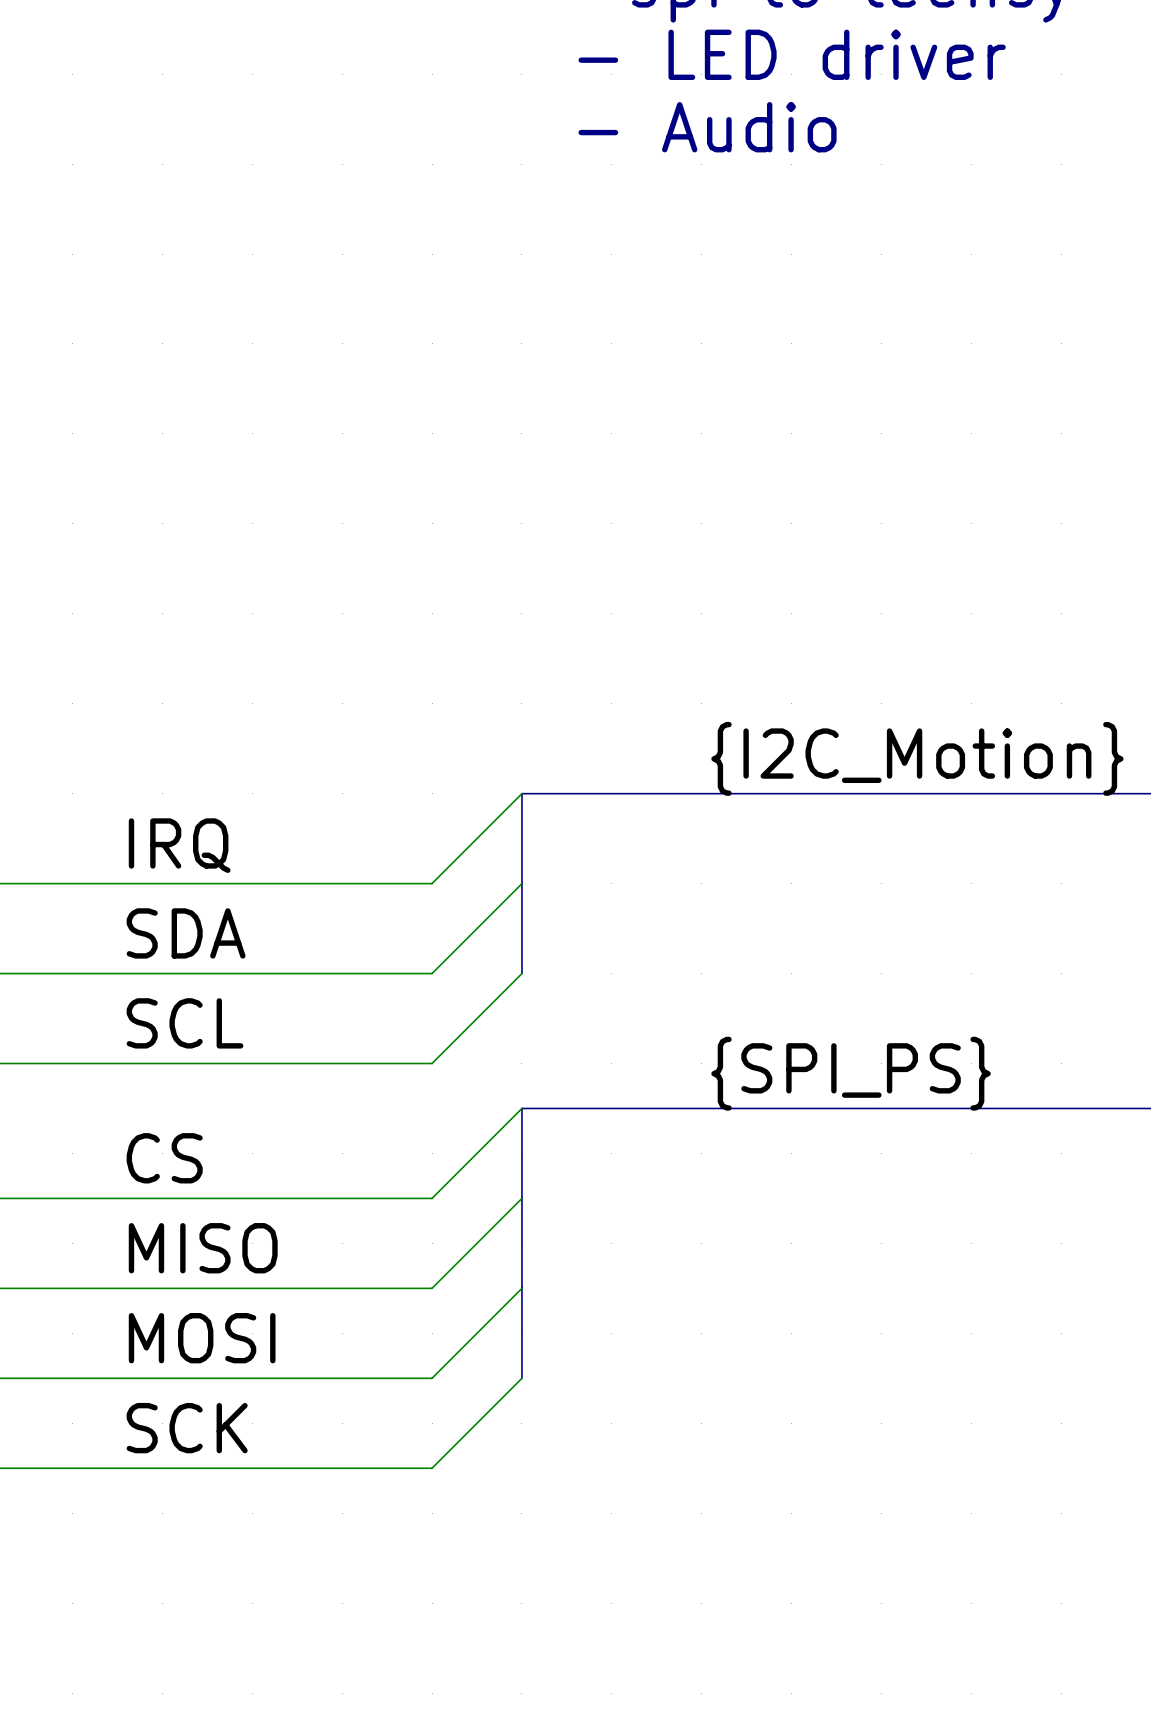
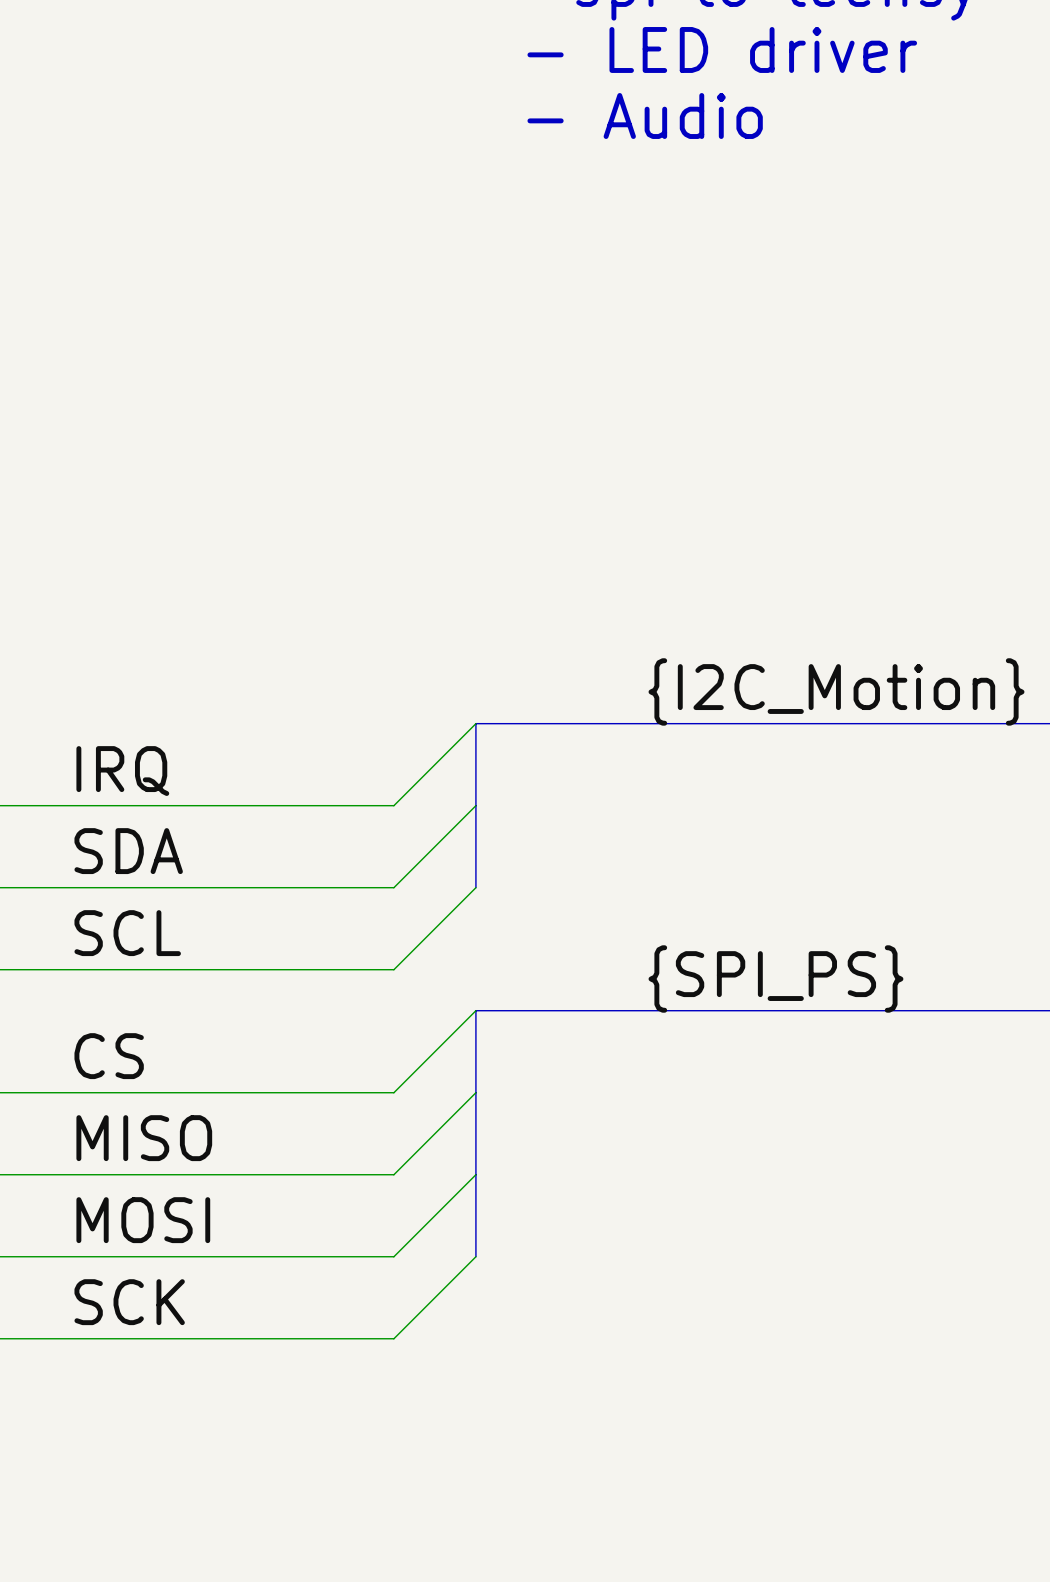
label position: IRQ (179, 845) -> IRQ (122, 771)
label position: SDA (186, 933) -> SDA (128, 851)
label position: SCL (185, 1023) -> SCL (127, 933)
label position: CS (164, 1158) -> CS (109, 1056)
label position: MISO (203, 1248) -> MISO (144, 1138)
label position: MOSI (202, 1338) -> MOSI (143, 1220)
label position: SCK (187, 1428) -> SCK (129, 1302)

